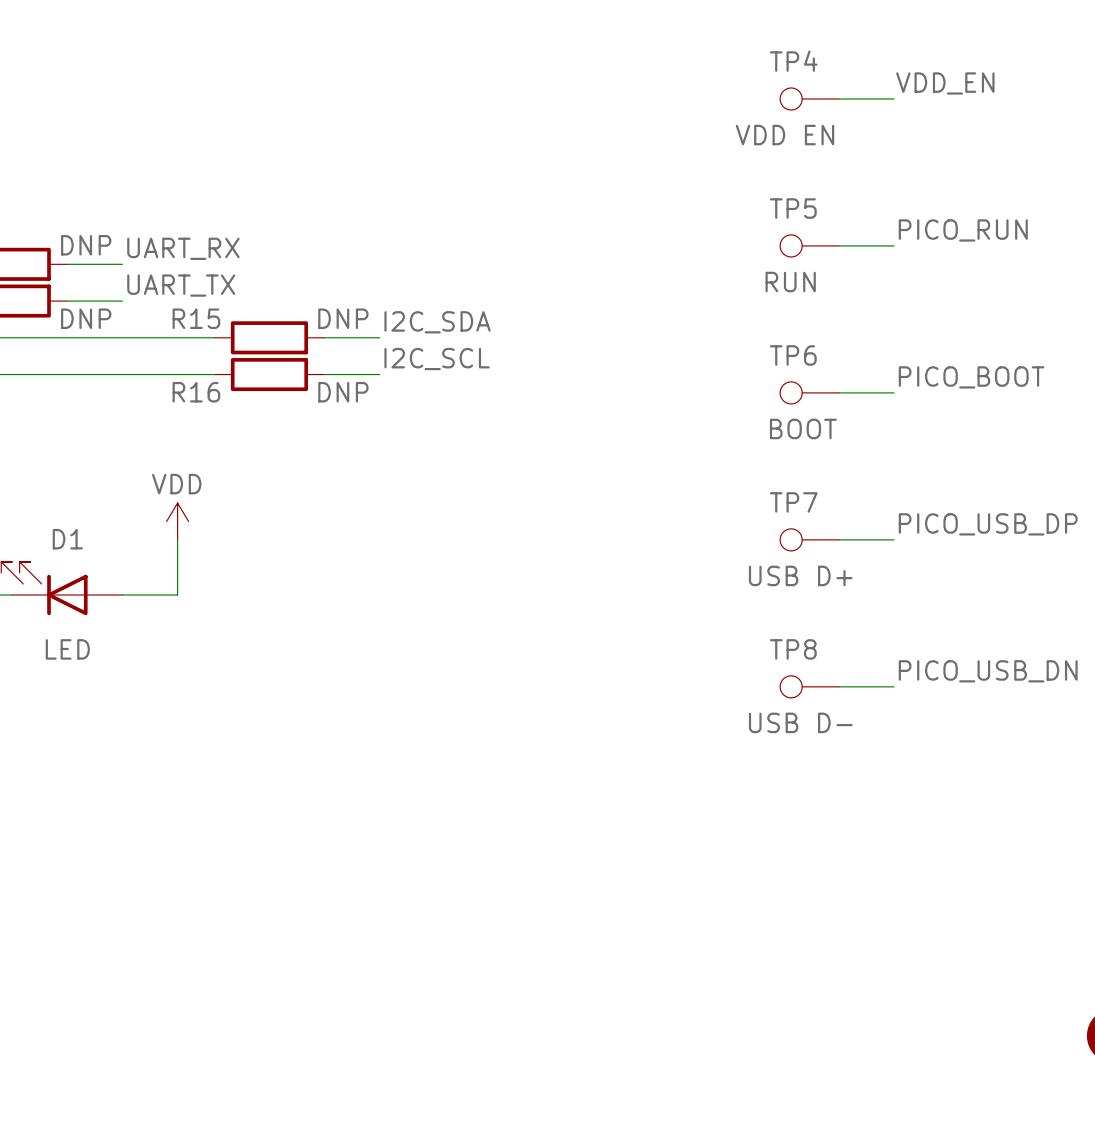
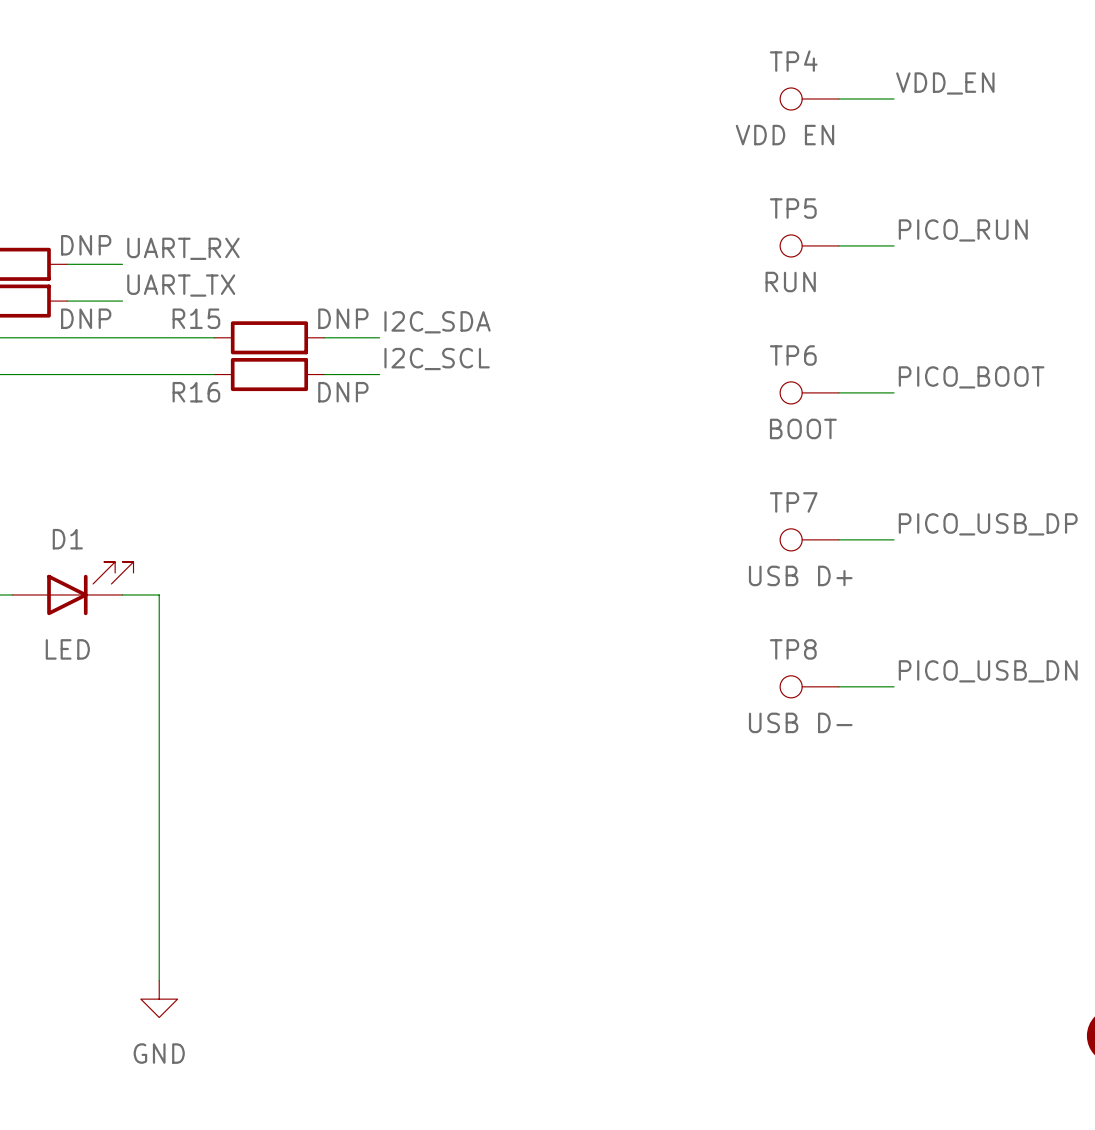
power symbol: VDD (177, 521) -> none
wire: (177, 539) (177, 594) (159, 594) -> (159, 980) (159, 594)
D1 flip: as is (44, 588) -> left-right (90, 588)
power symbol: none -> GND (159, 999)

